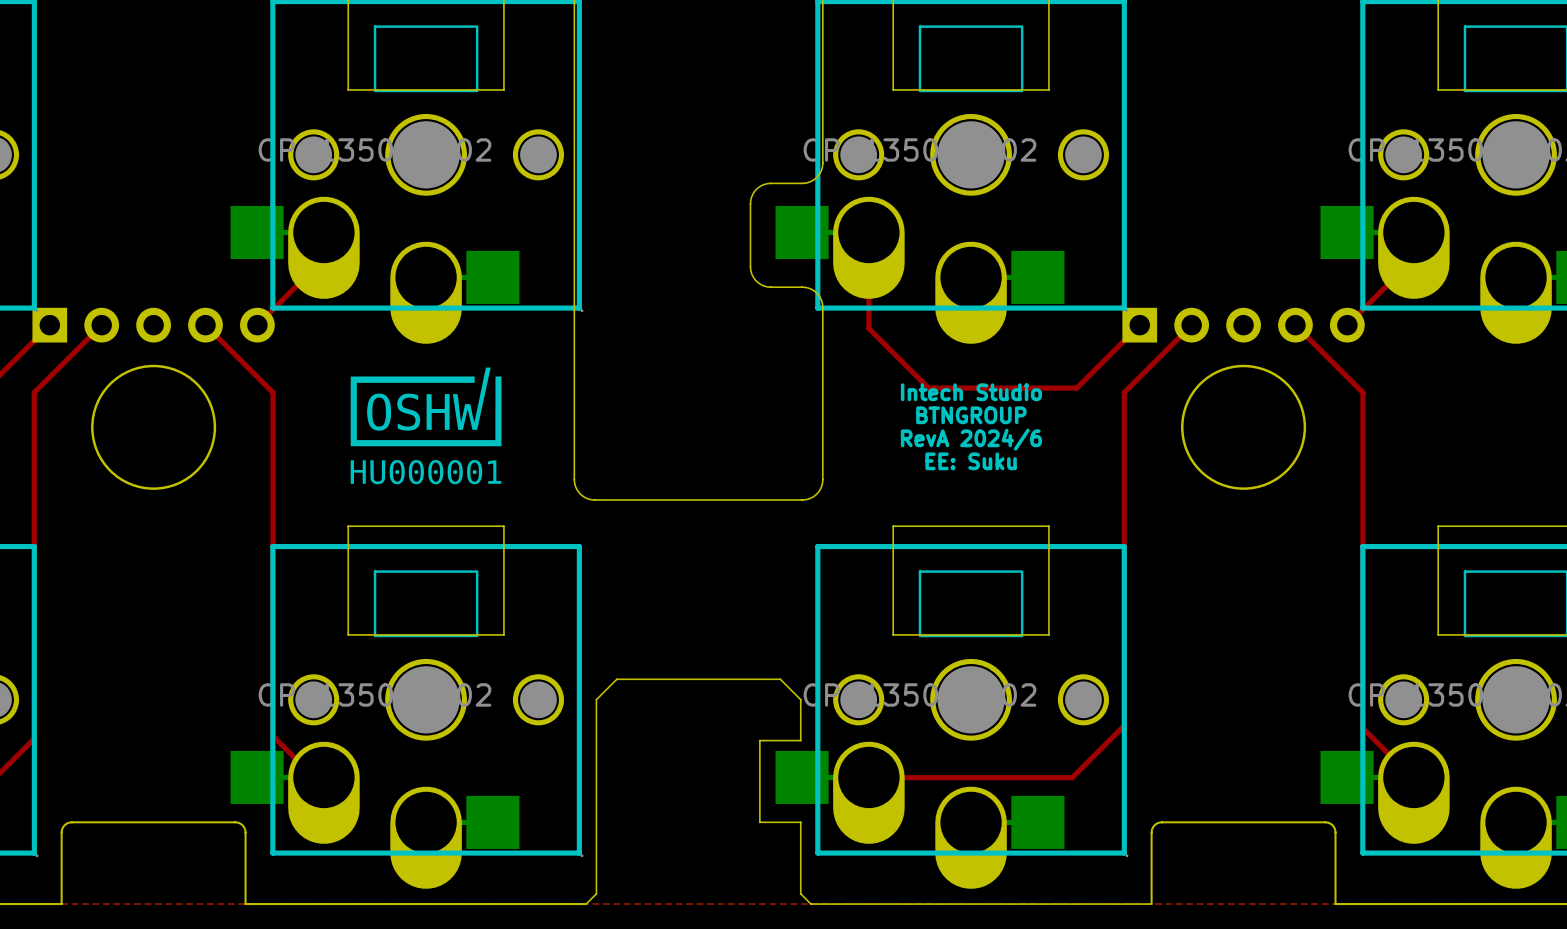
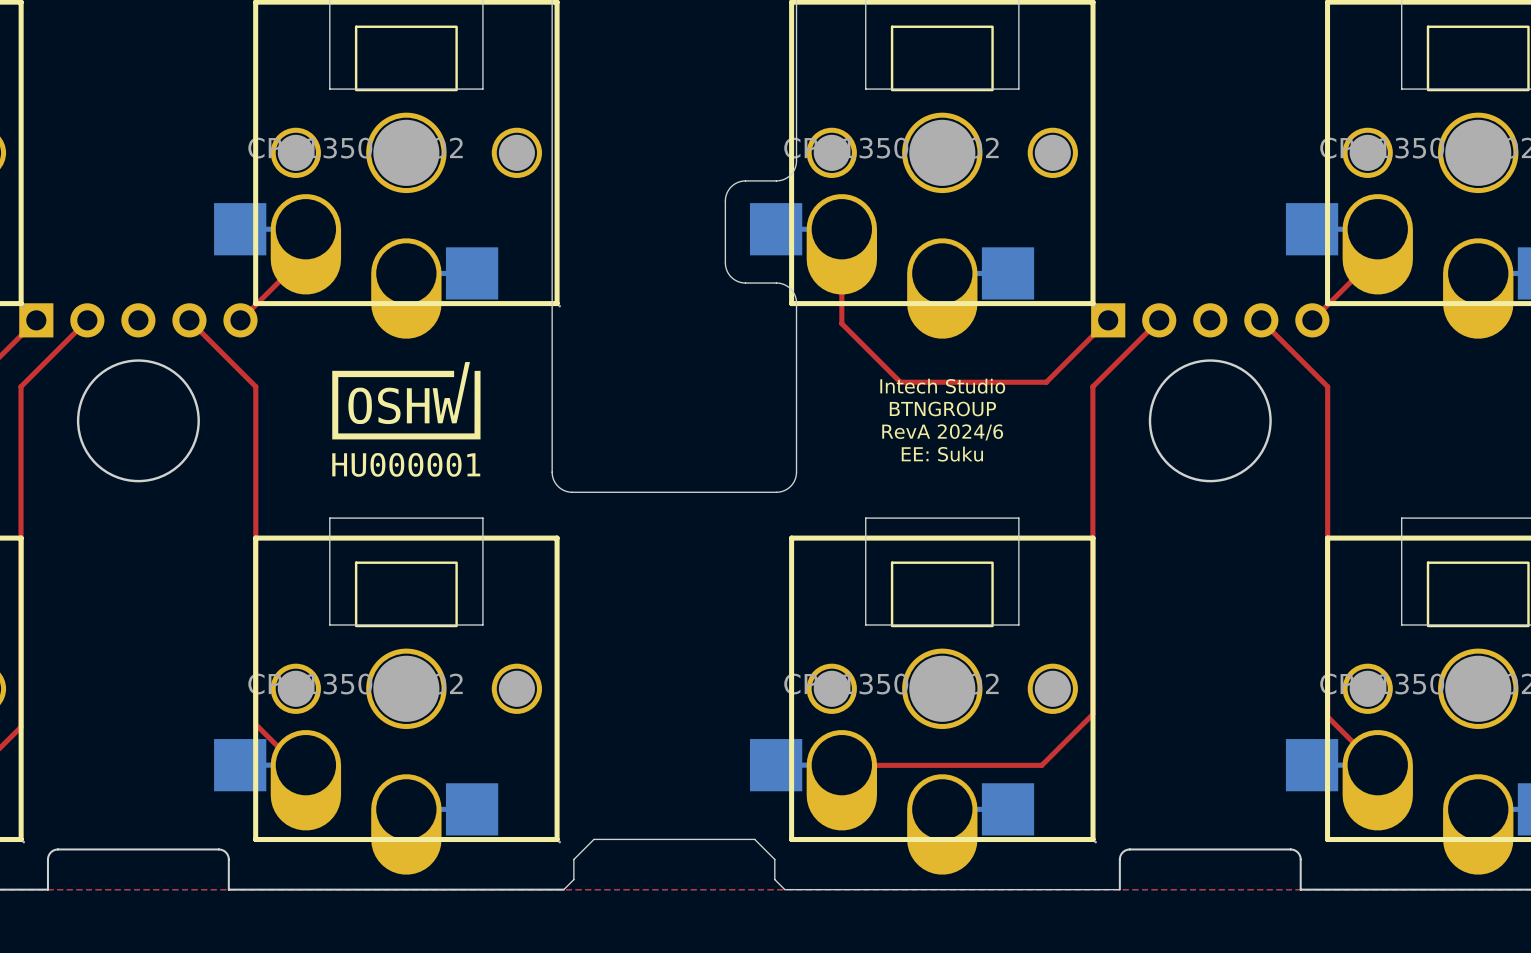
board edge: (61, 873) (62, 829) (65, 824) (71, 822) (237, 822) (242, 825) (245, 831) (245, 873) -> (47, 859) (50, 852) (58, 849) (218, 849) (225, 852) (228, 859)
board edge: (596, 873) (596, 699) (616, 679) (780, 679) (800, 699) (800, 740) (759, 740) (759, 822) (800, 822) (800, 873) -> (573, 859) (593, 839) (754, 839) (774, 859)
board edge: (1151, 873) (1151, 829) (1155, 824) (1161, 822) (1327, 822) (1332, 825) (1335, 831) (1335, 873) -> (1119, 859) (1122, 852) (1129, 849) (1290, 849) (1297, 852) (1300, 859)

